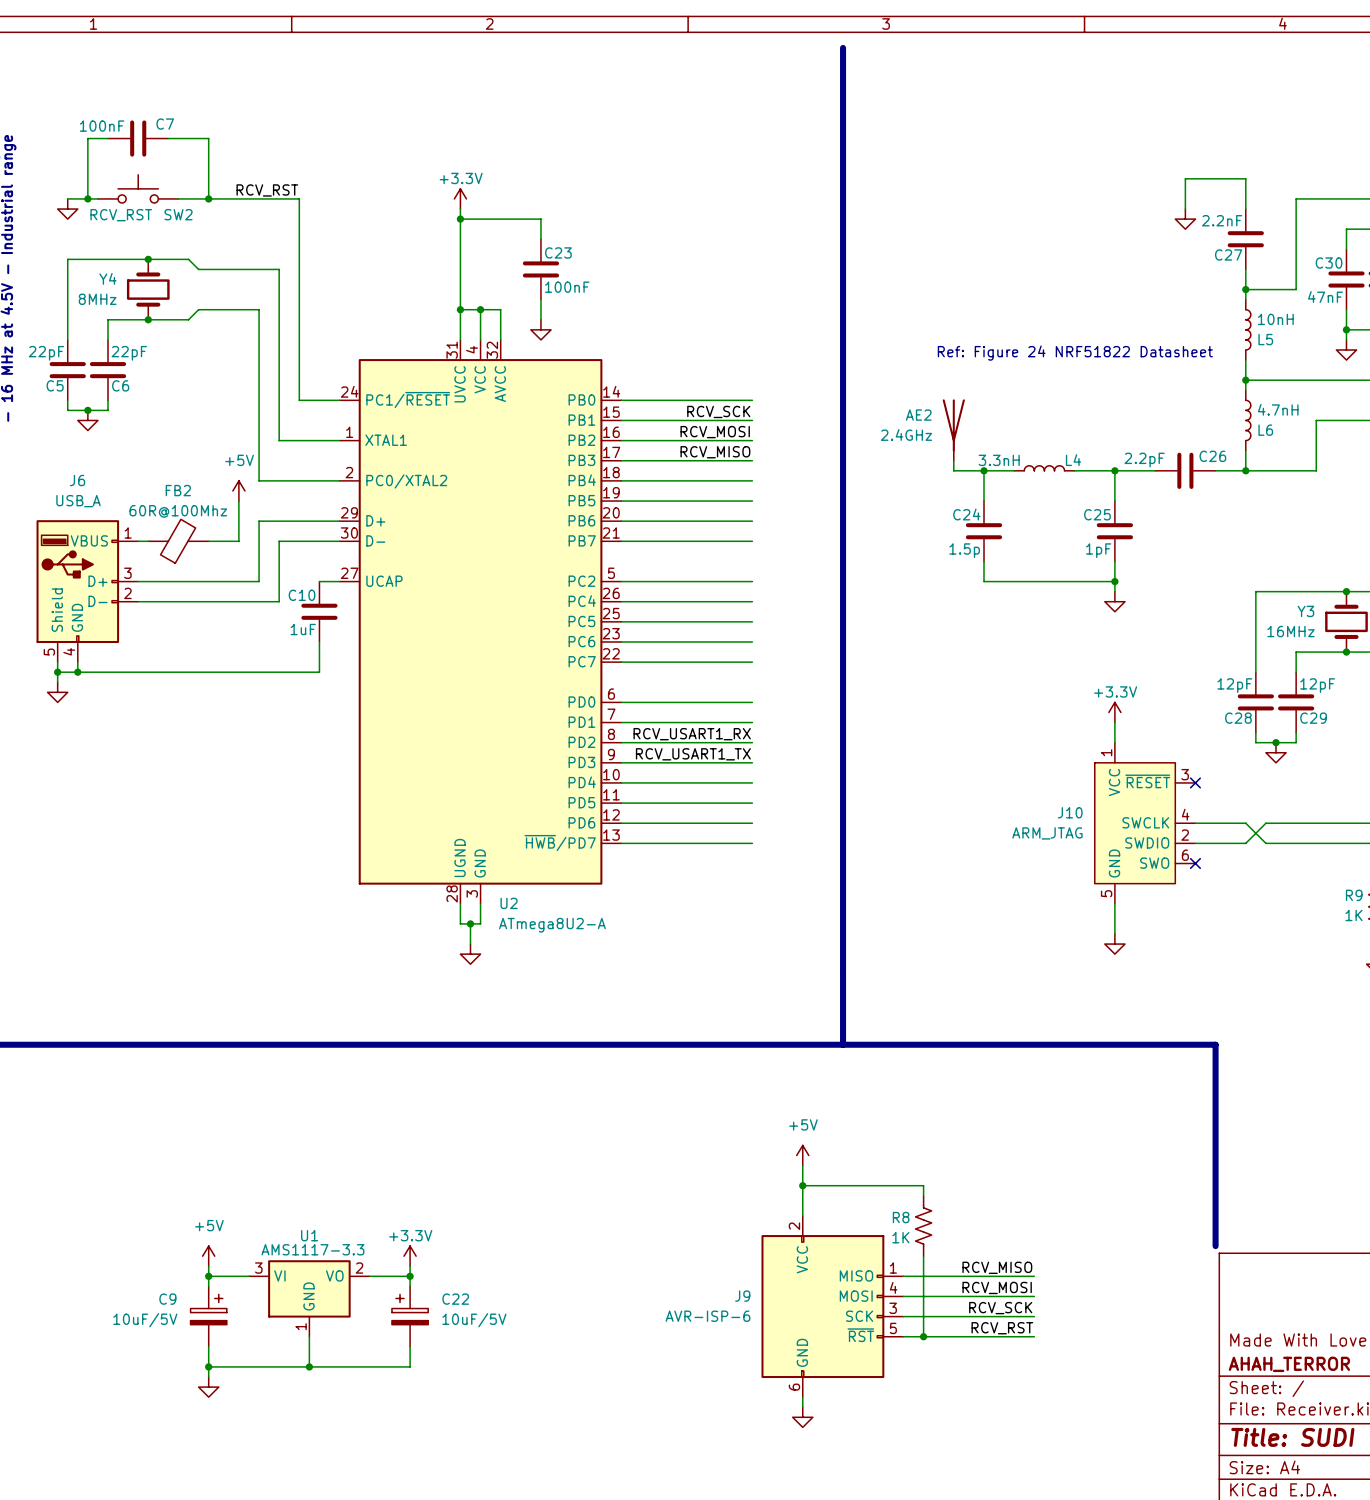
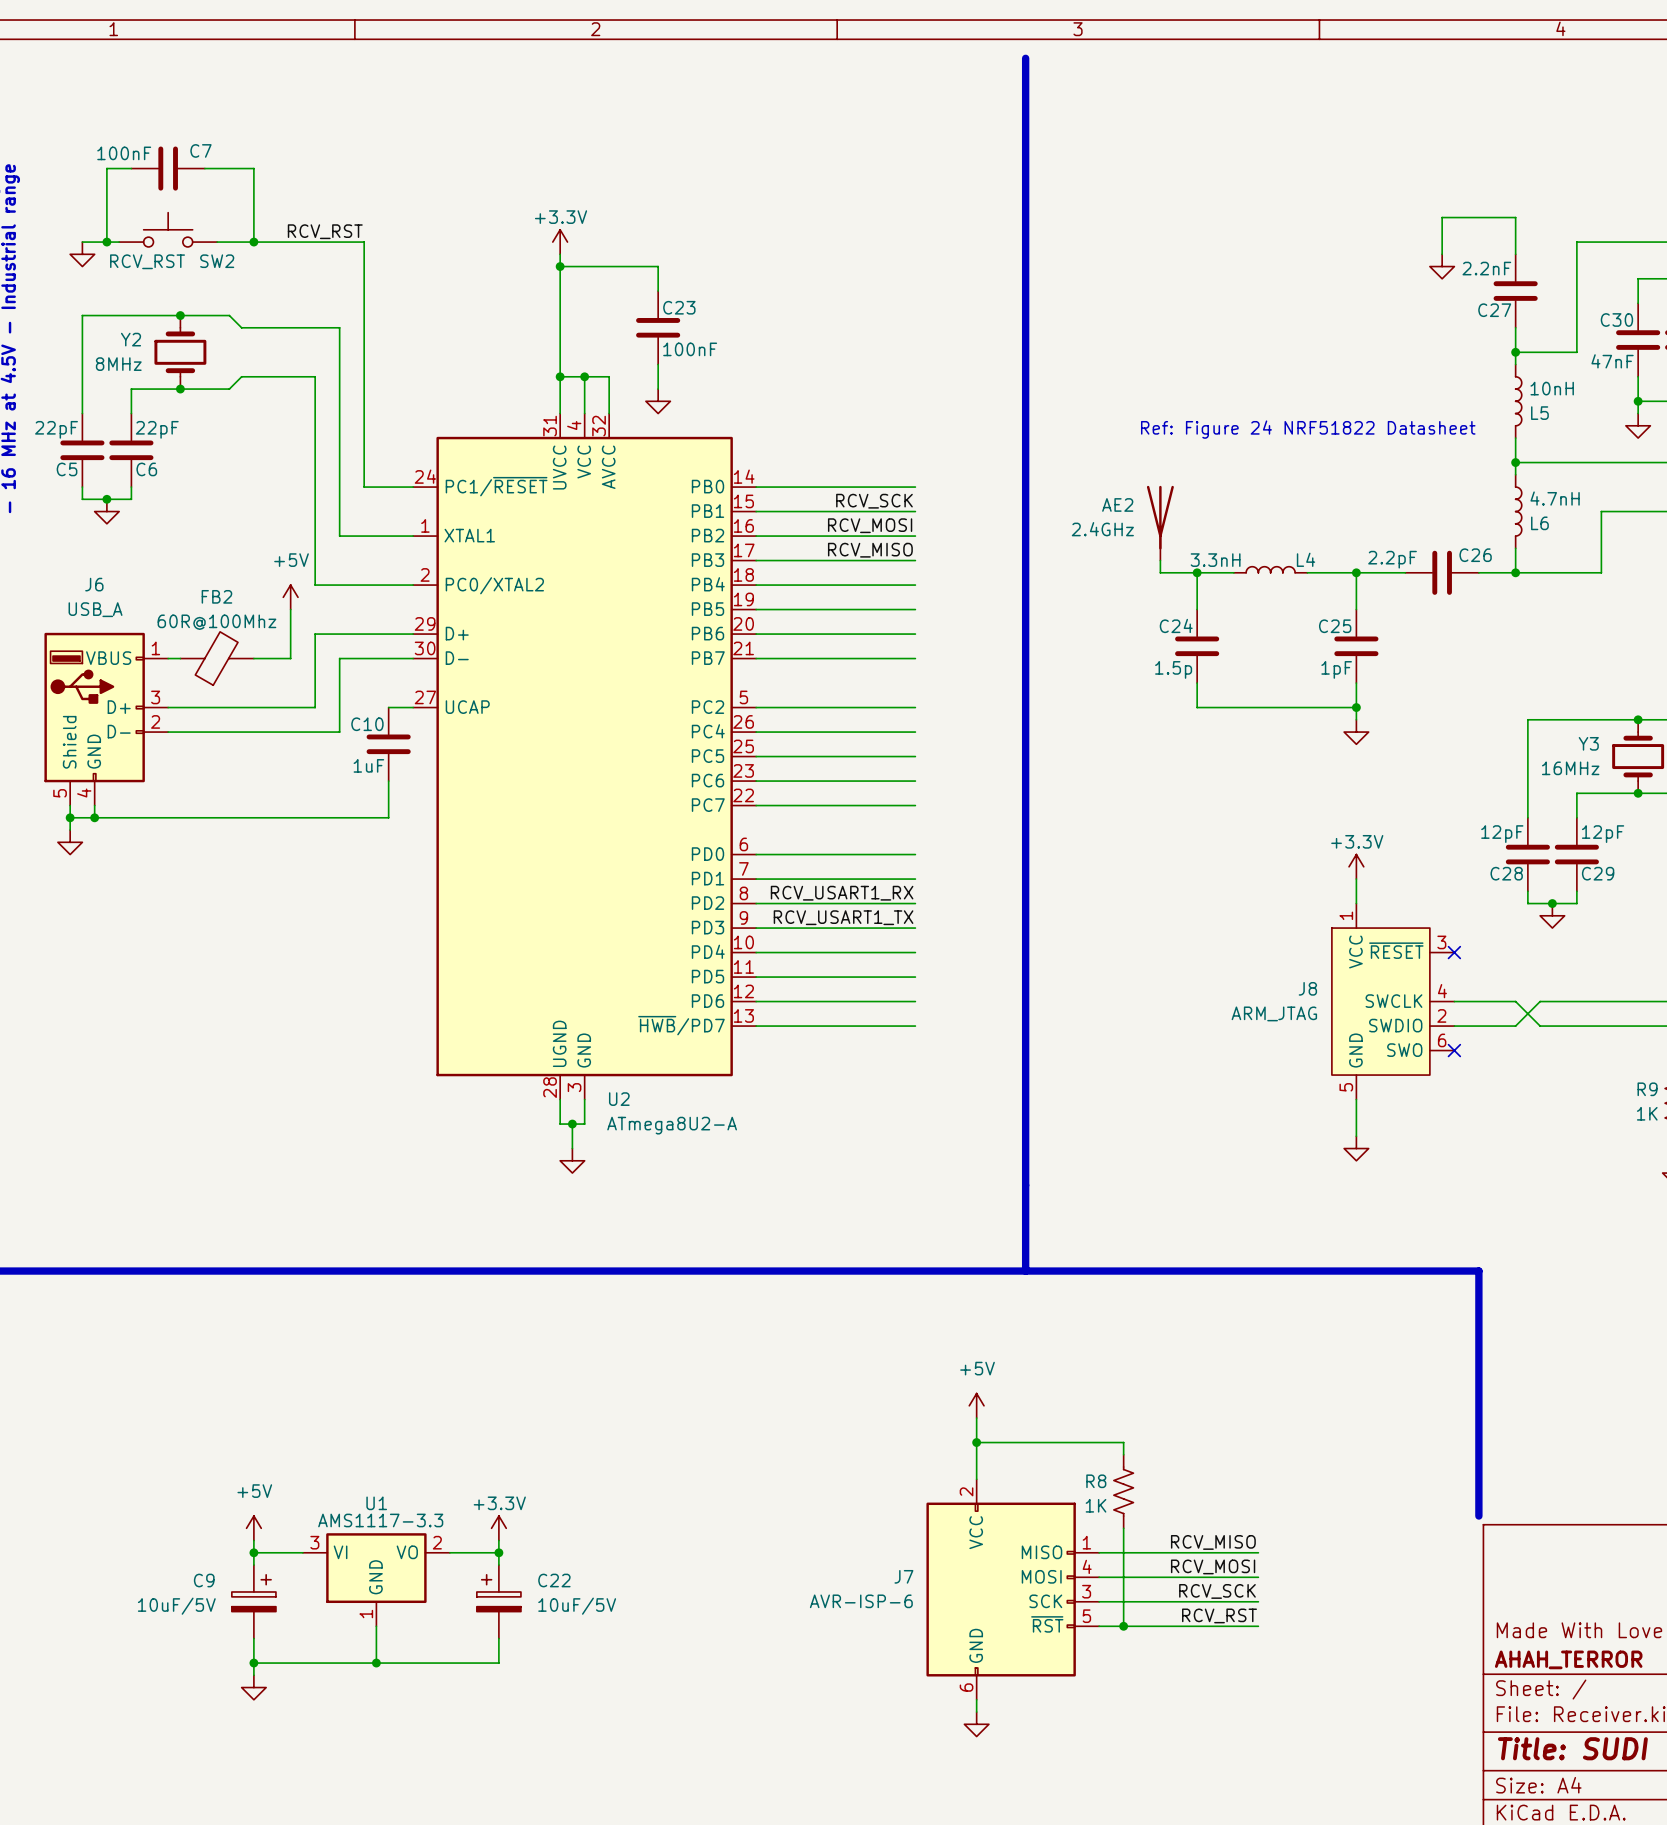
Y4 name: Y4 (107, 278) -> Y2 (131, 339)
J10 name: J10 (1070, 812) -> J8 (1307, 988)
J9 name: J9 (742, 1296) -> J7 (903, 1576)

